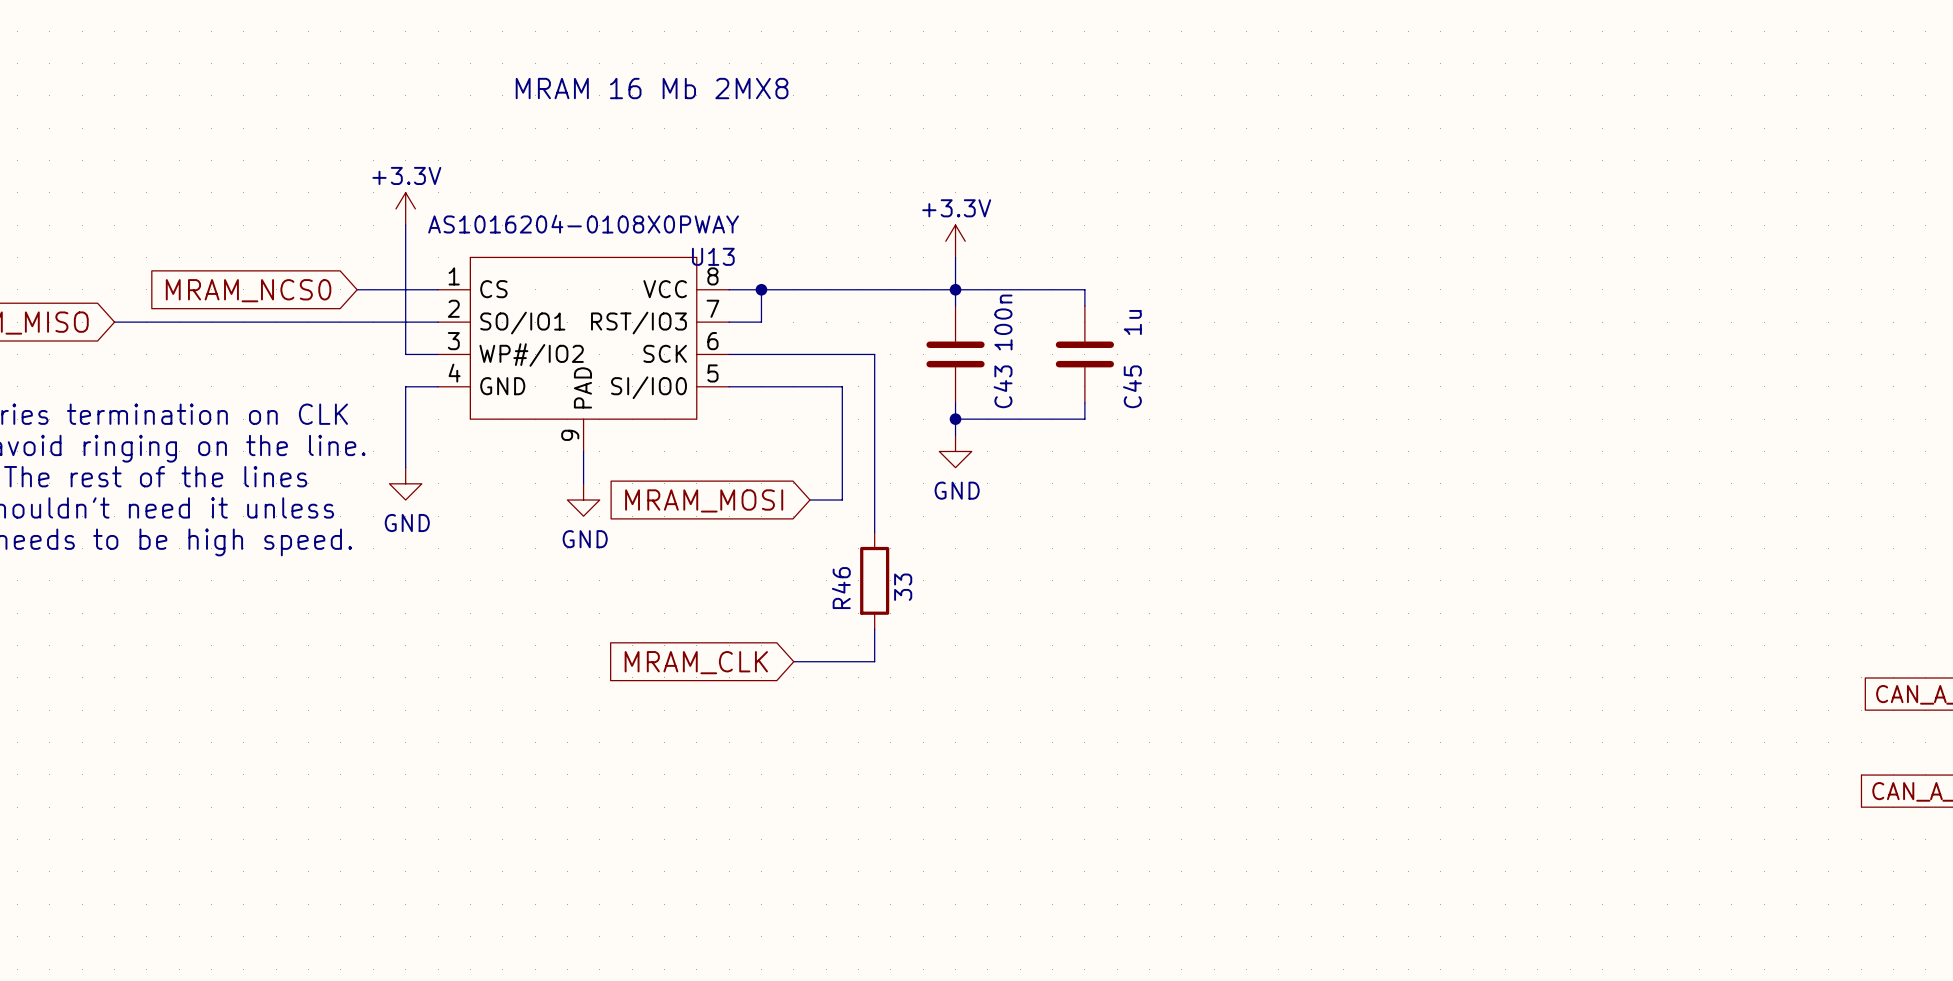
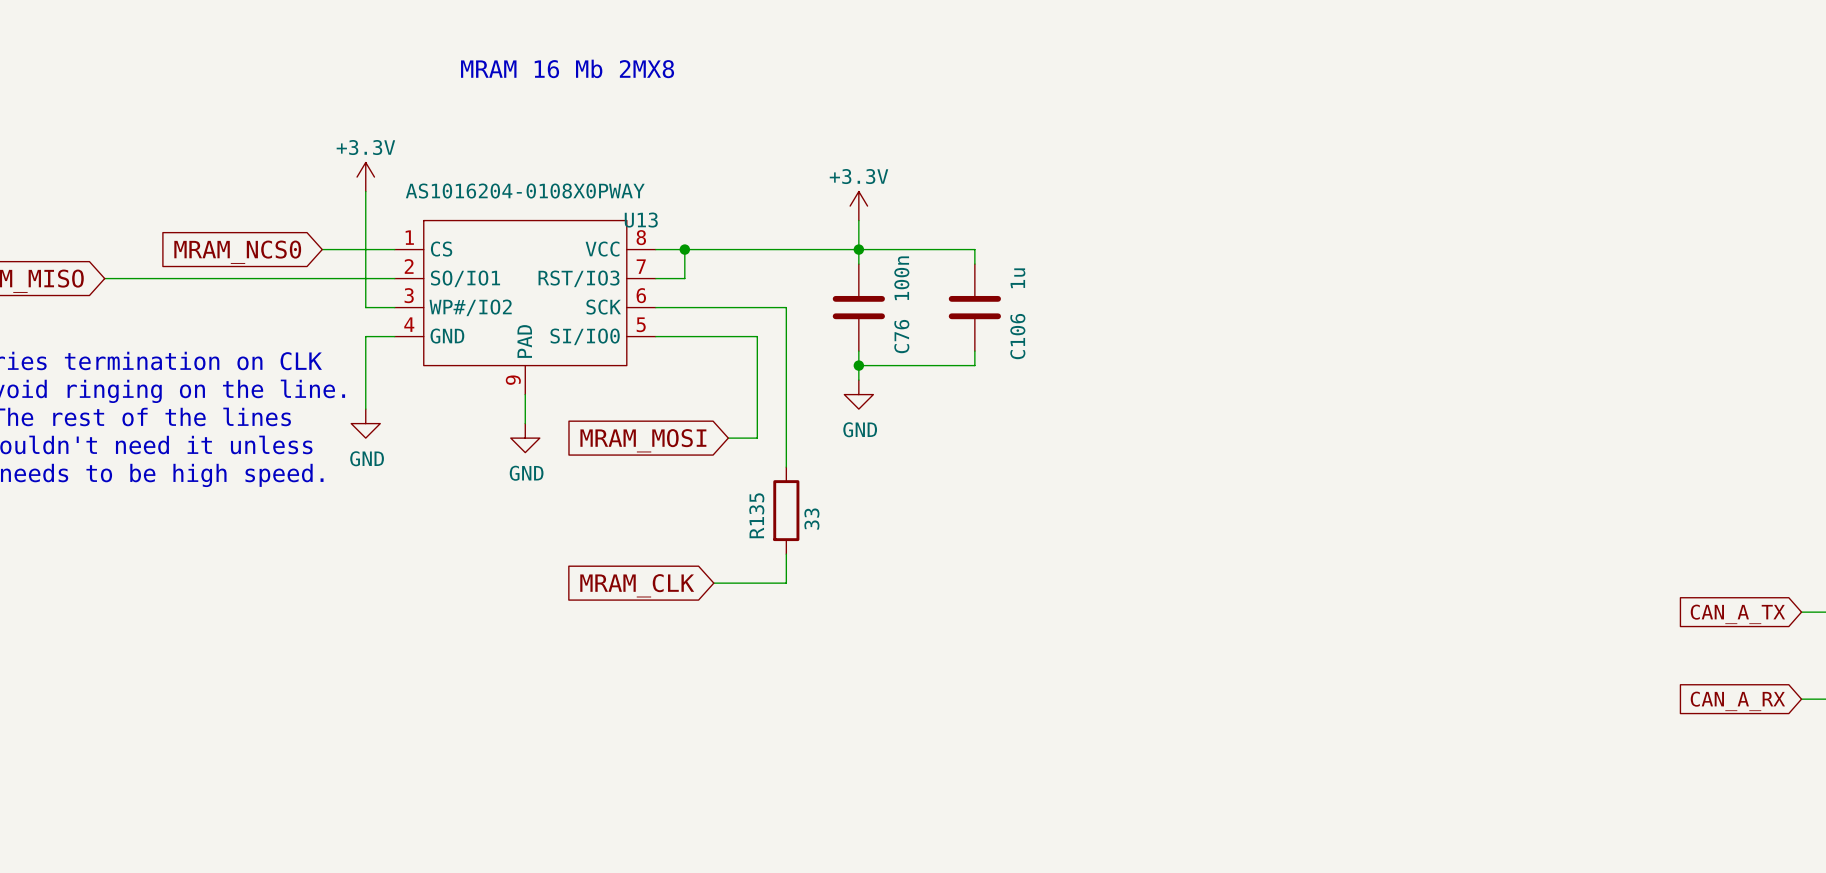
C43 name: C43 (1003, 386) -> C76 (901, 336)
C45 name: C45 (1132, 386) -> C106 (1017, 336)
R46 name: R46 (841, 588) -> R135 (756, 515)

